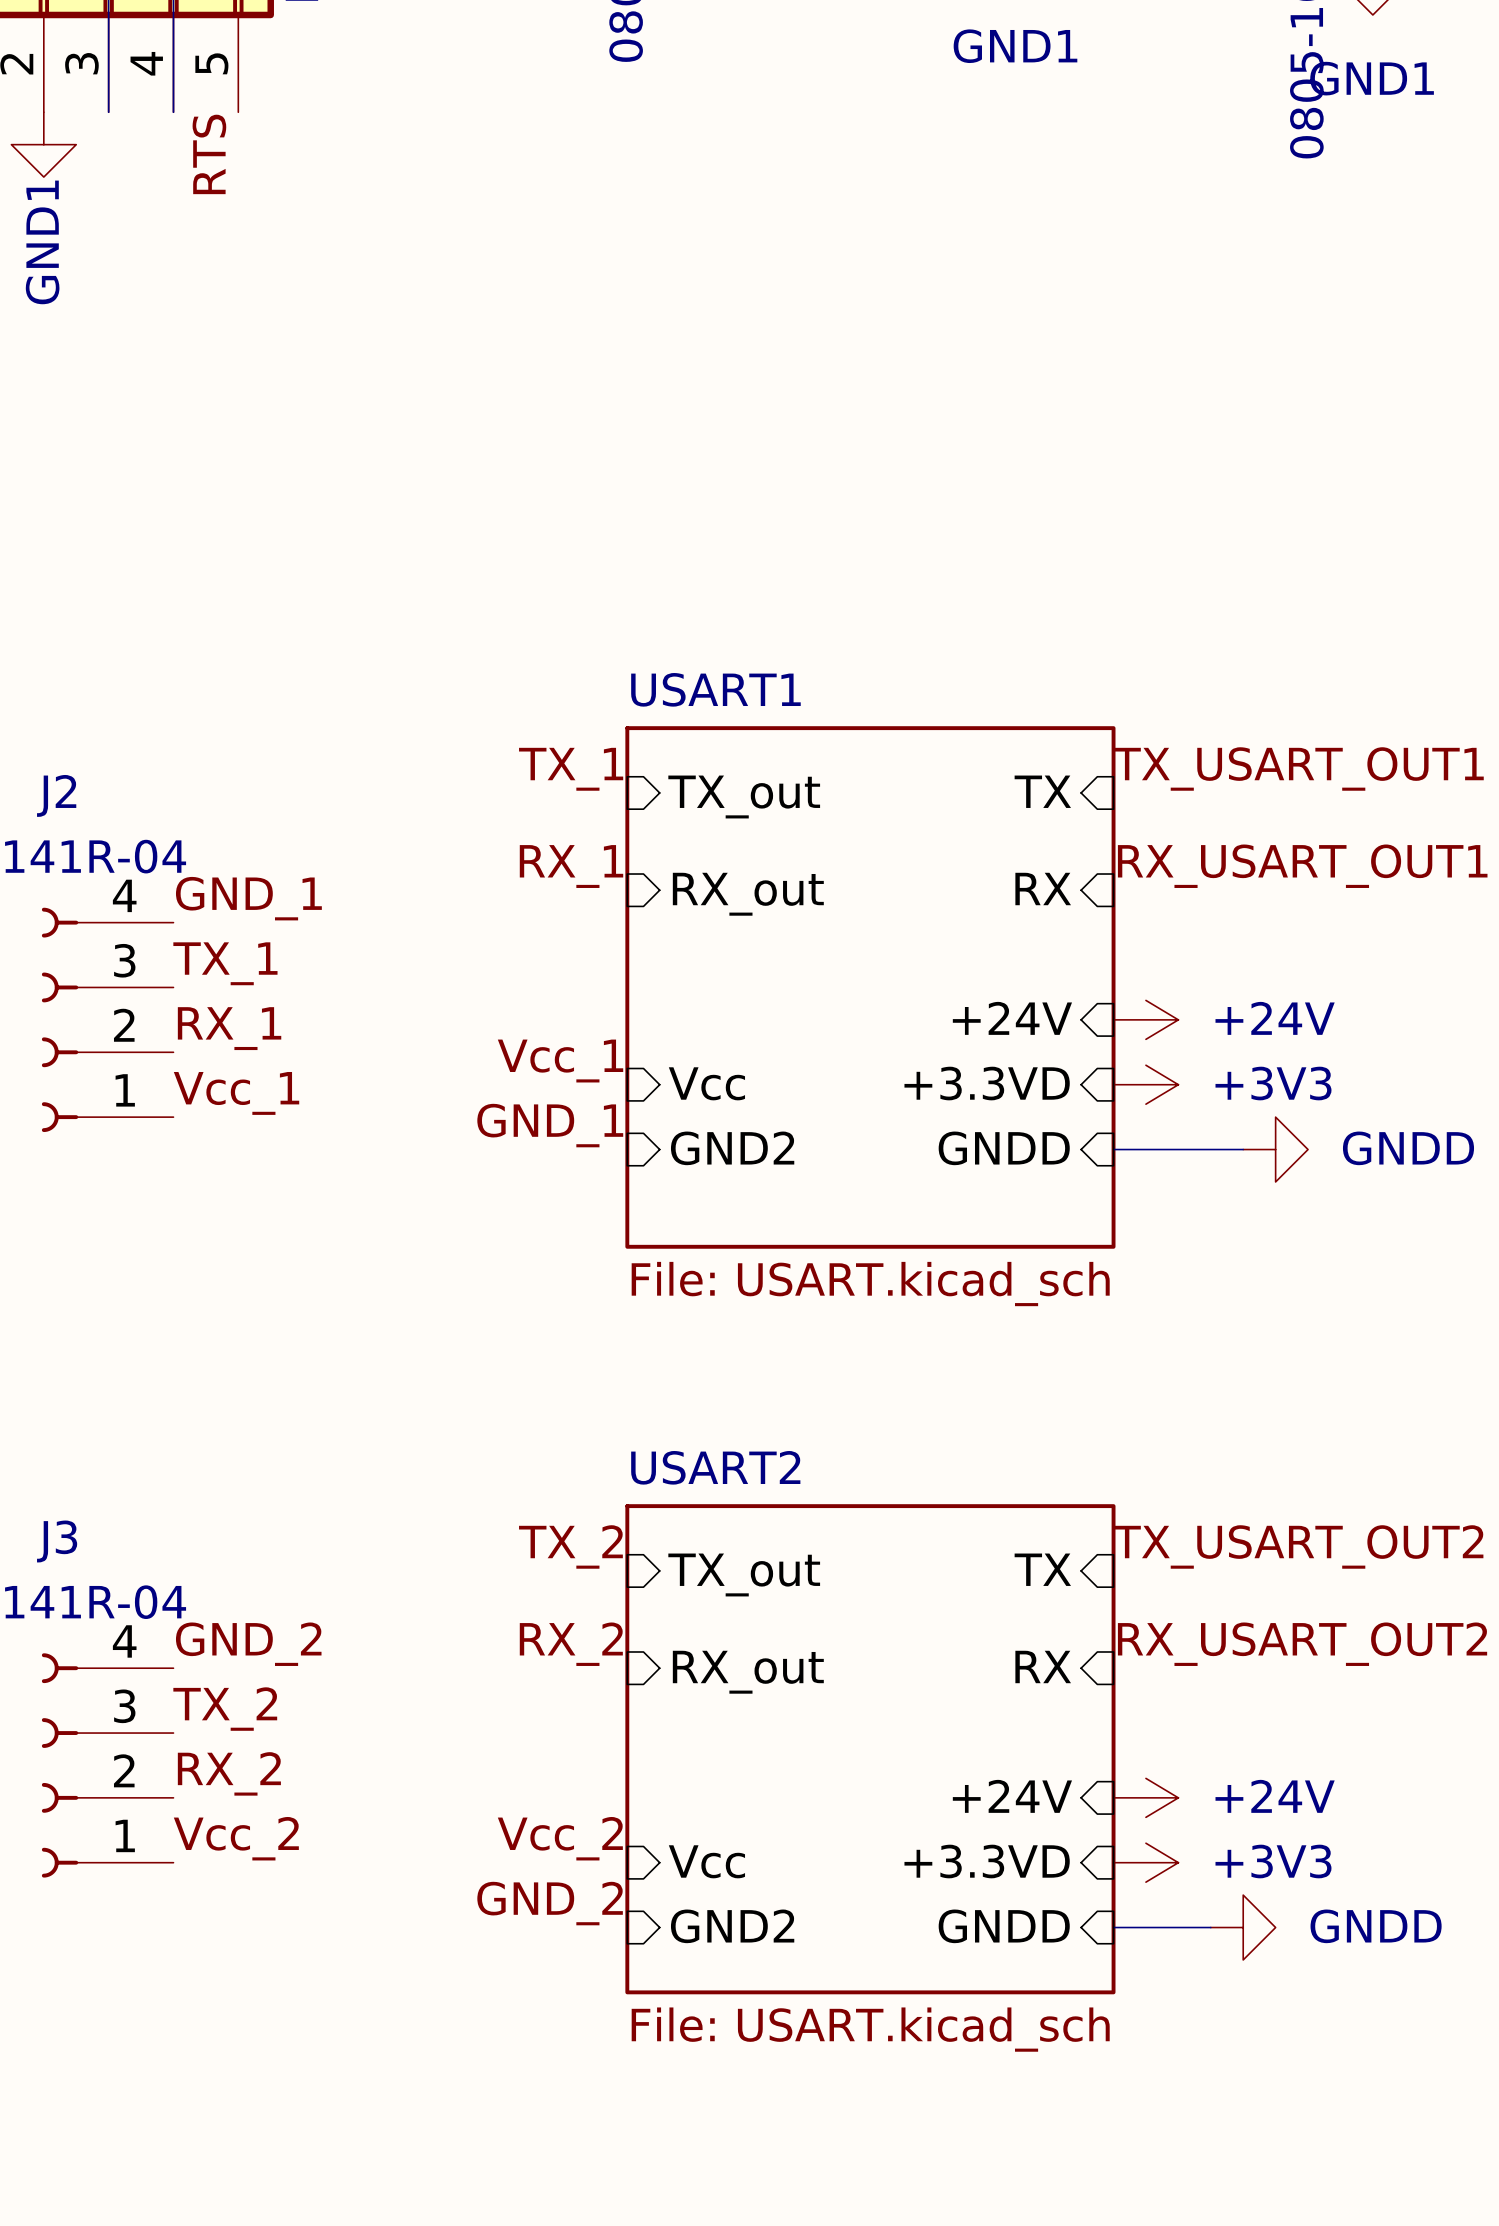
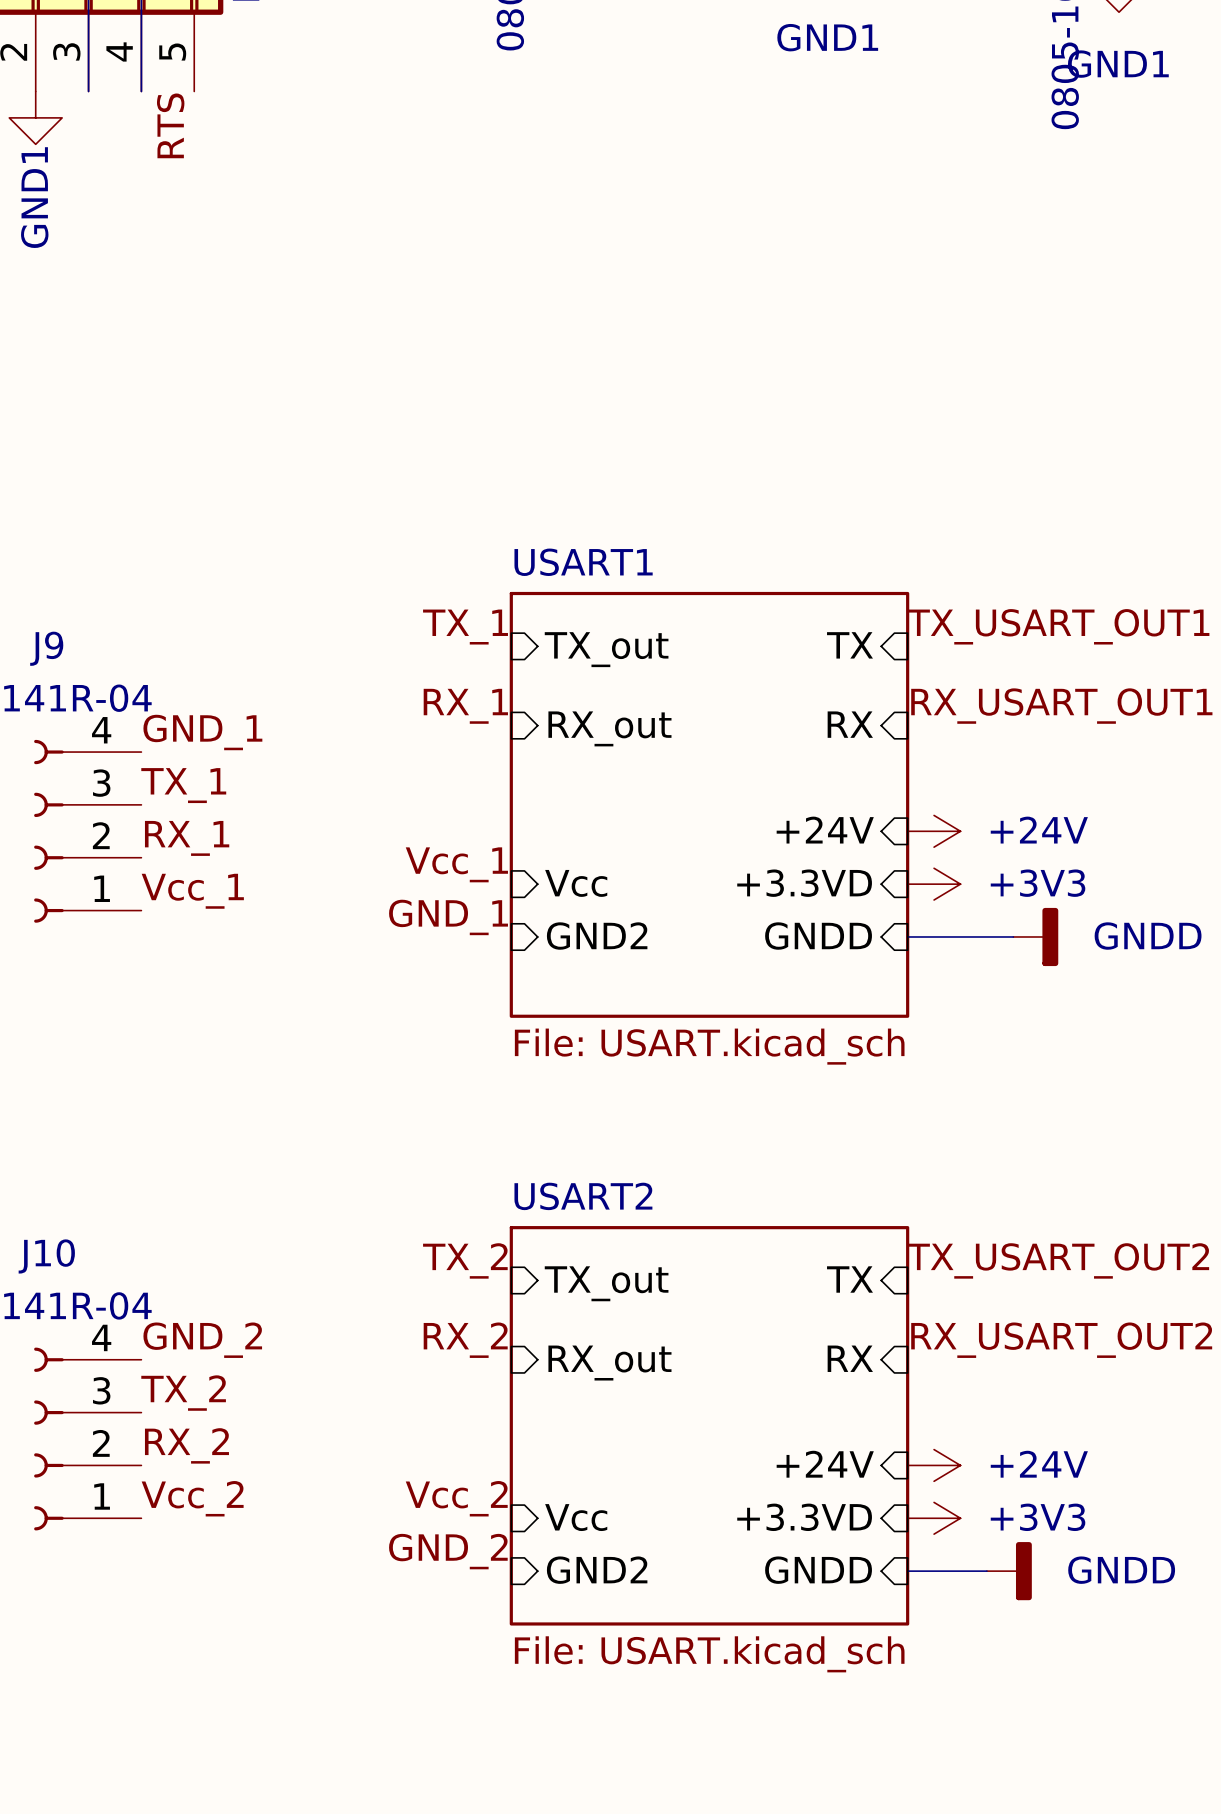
J2 name: J2 (56, 795) -> J9 (46, 648)
power symbol shape: [1243, 1117, 1309, 1182] -> [1013, 907, 1059, 967]
J3 name: J3 (57, 1541) -> J10 (46, 1256)
power symbol shape: [1210, 1895, 1276, 1960] -> [986, 1542, 1032, 1601]

